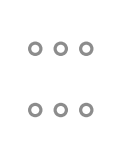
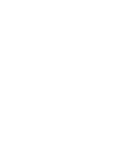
part: (60, 48) -> none
part: (60, 110) -> none

